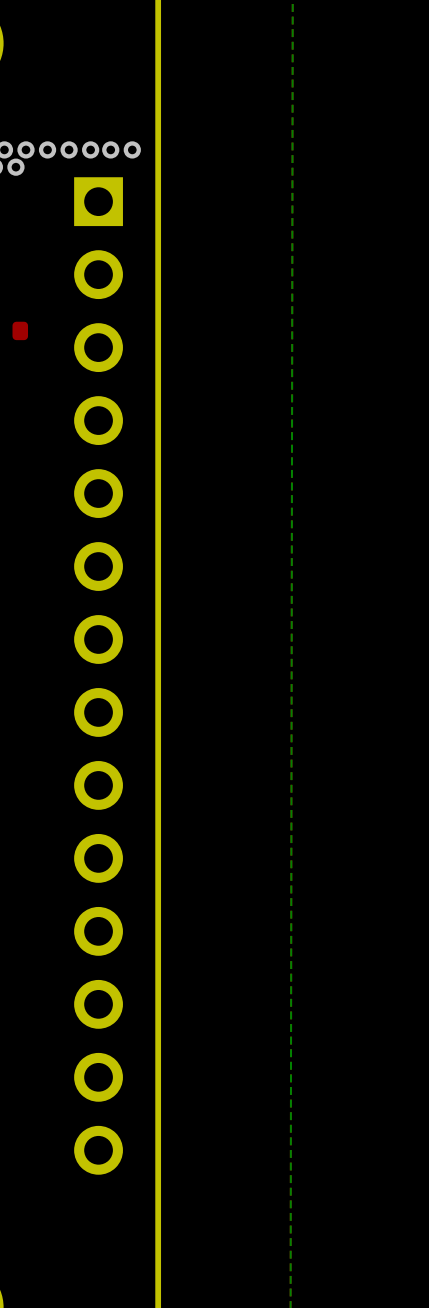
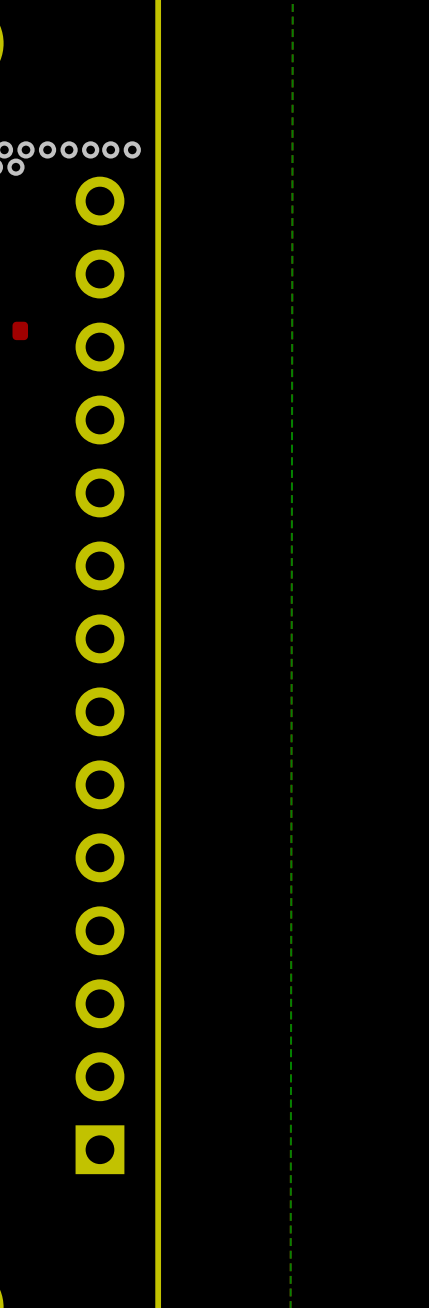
part rotation: 0° (98, 675) -> 180° (99, 675)

